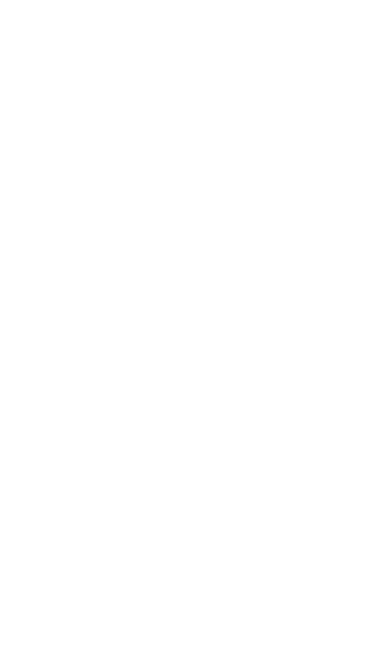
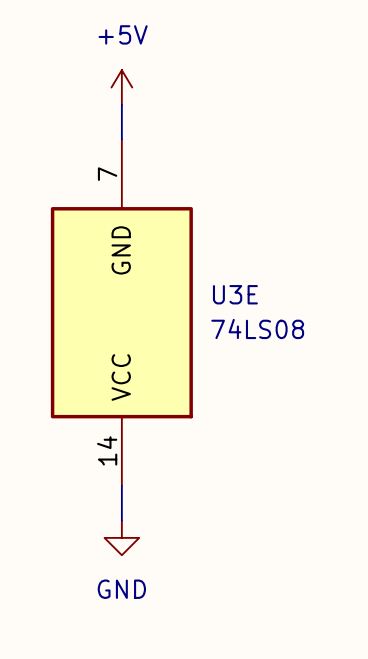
power symbol: none -> +5V (121, 87)
wire: none -> (121, 104) (121, 139)
U3E: none -> 74LS08 (121, 312)
wire: none -> (121, 485) (121, 520)
power symbol: none -> GND (121, 537)

